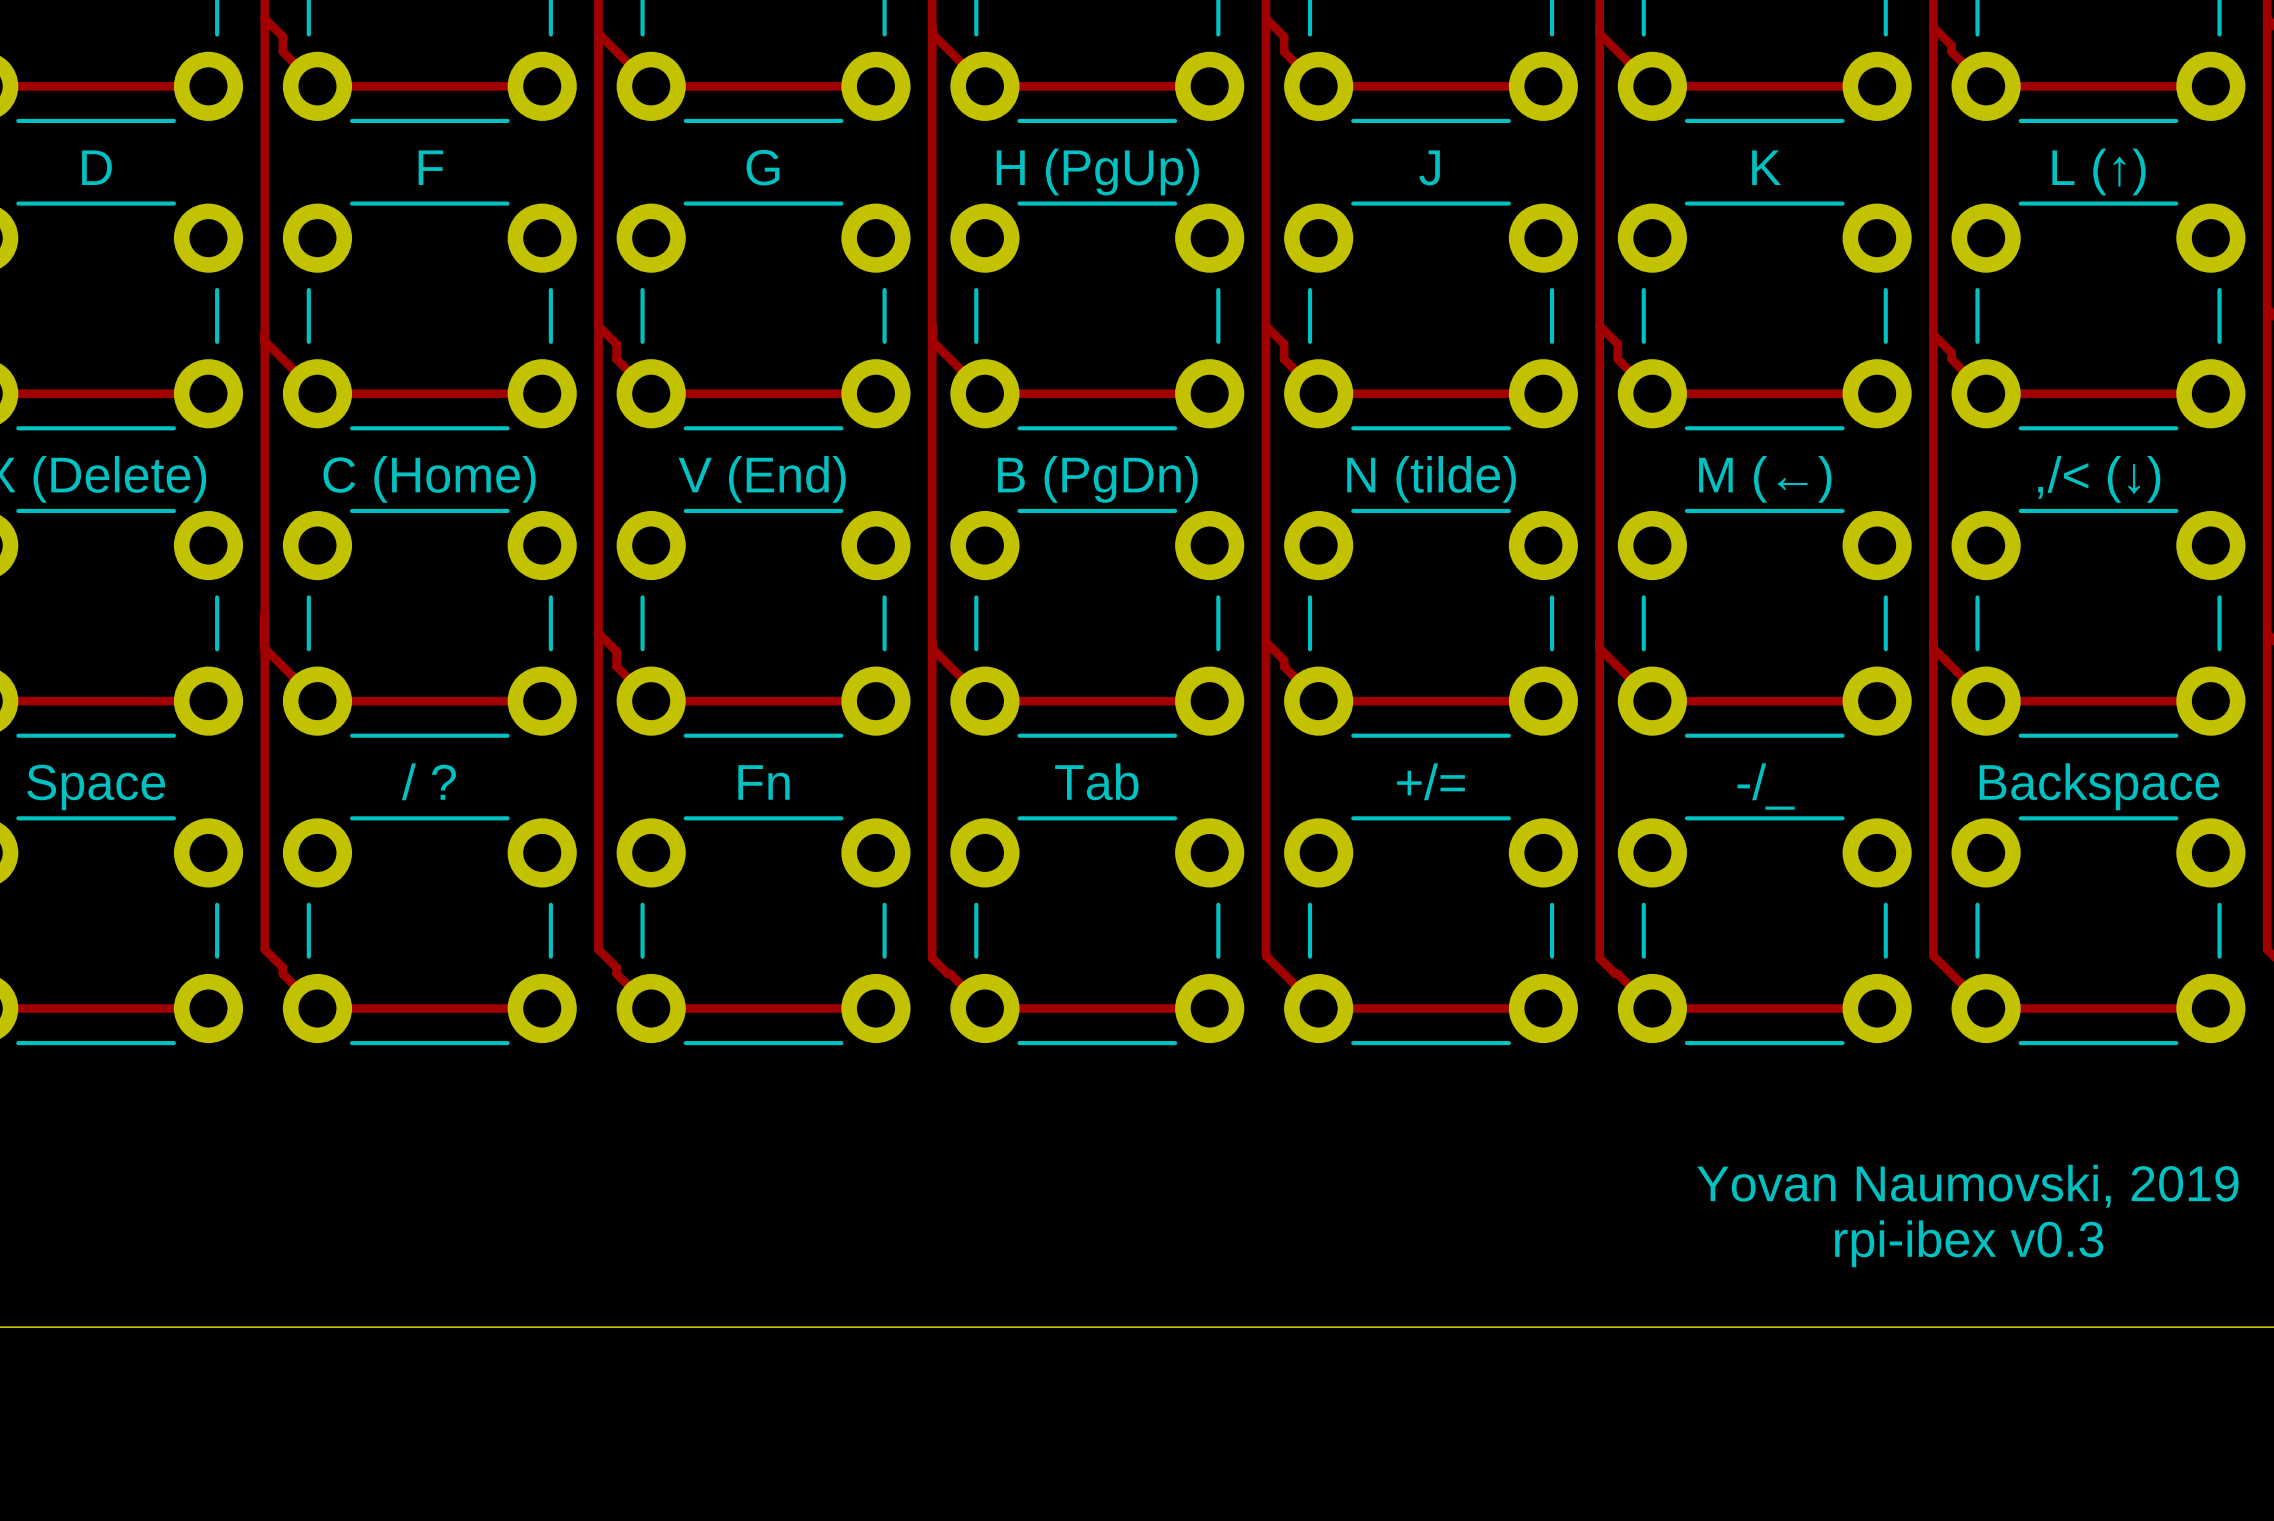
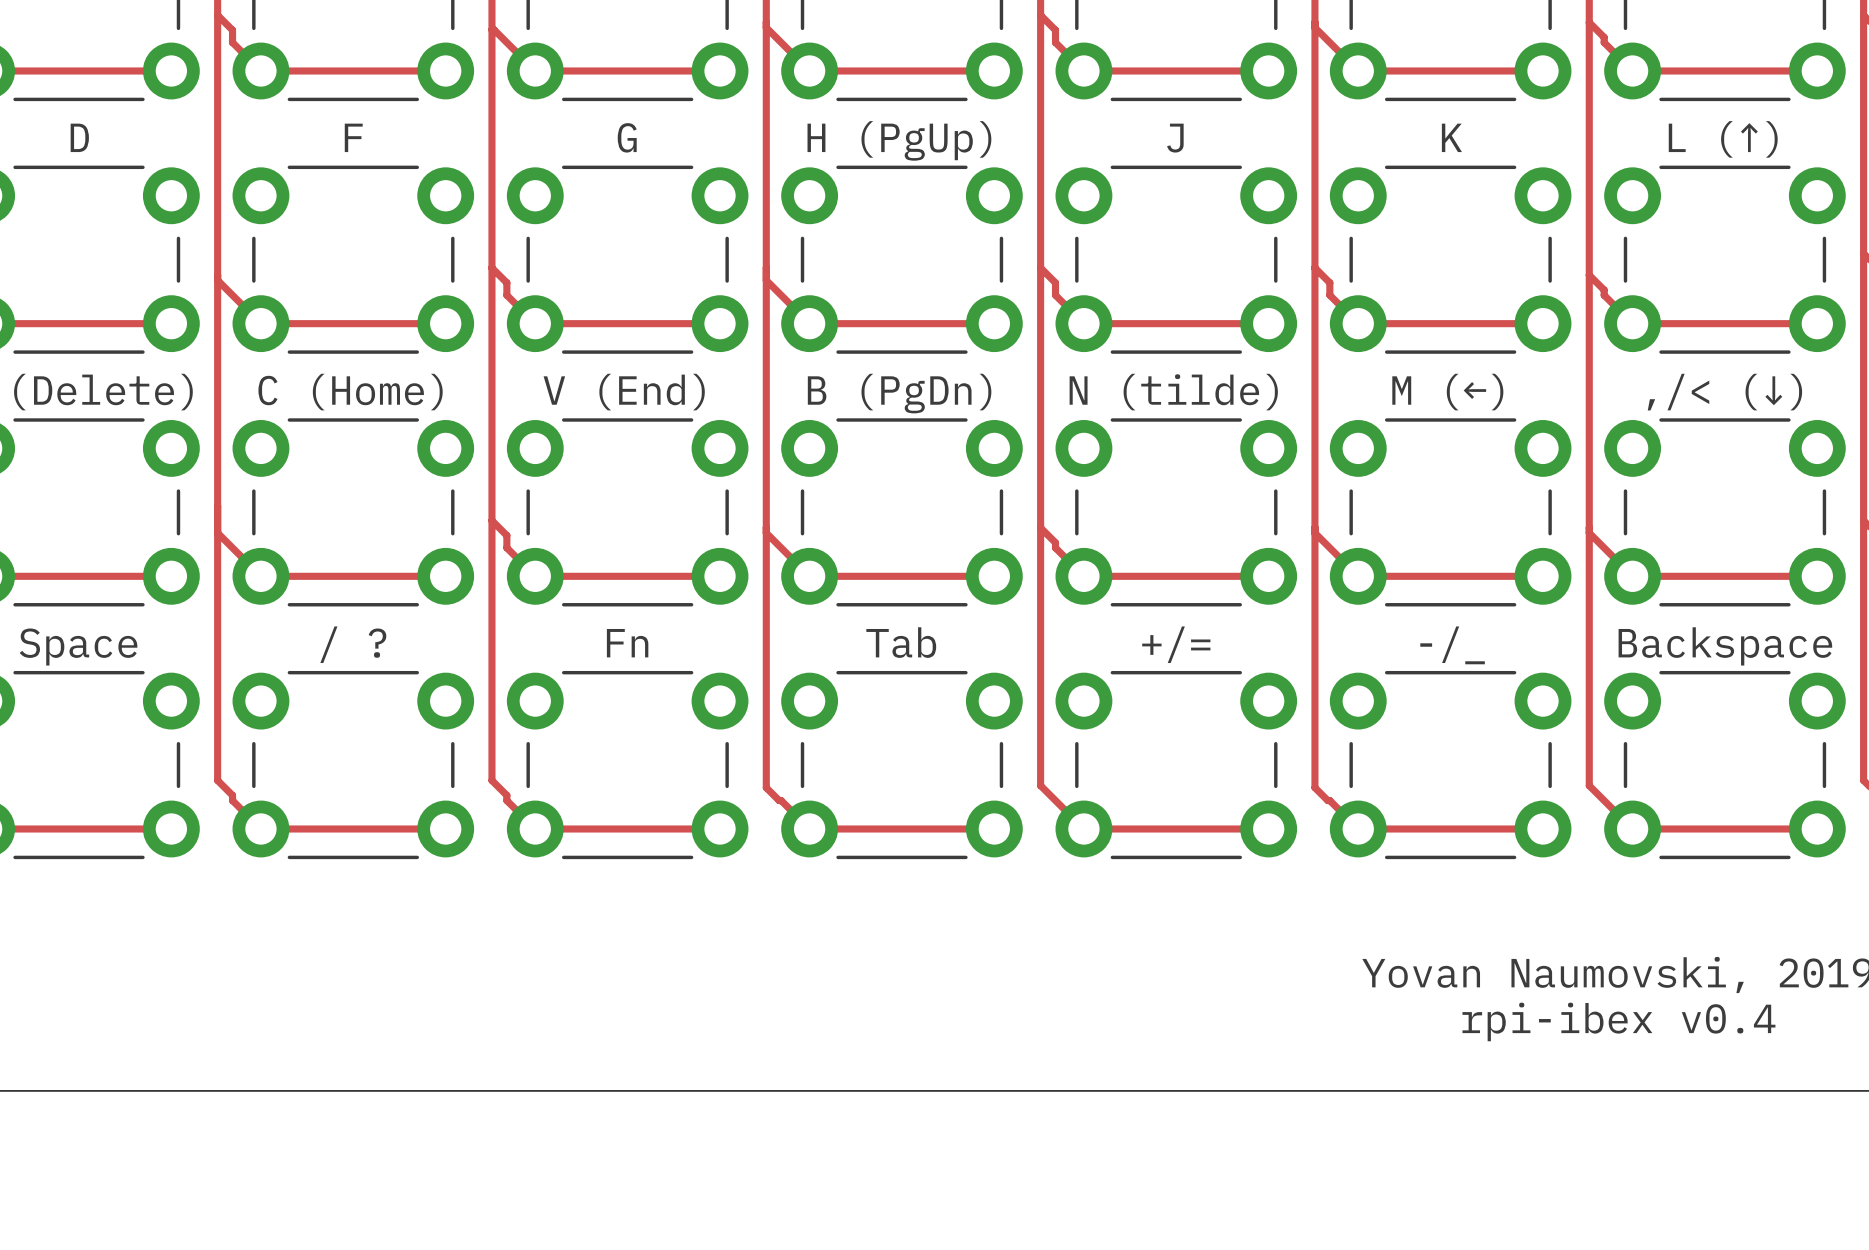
text: rpi-ibex v0.3 (1969, 1243) -> rpi-ibex v0.4 (1618, 1021)

